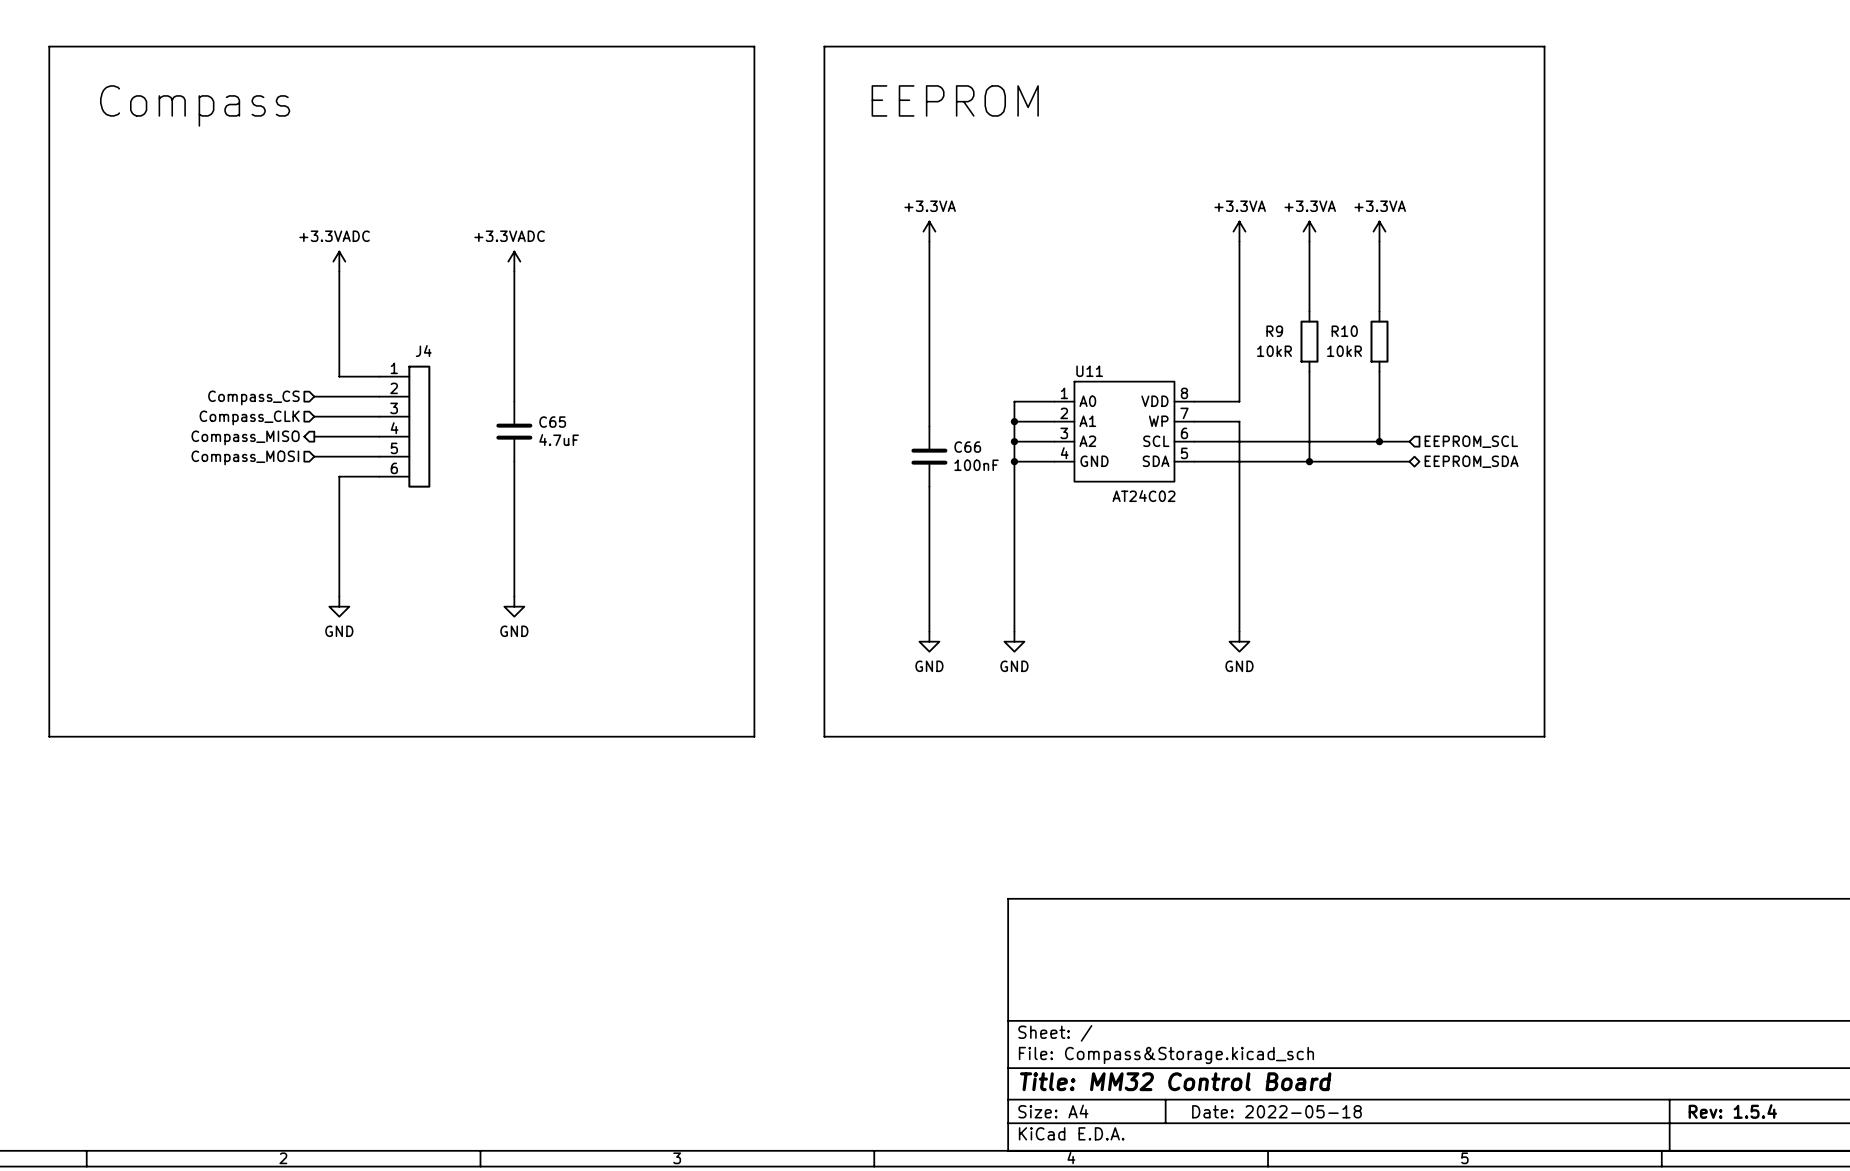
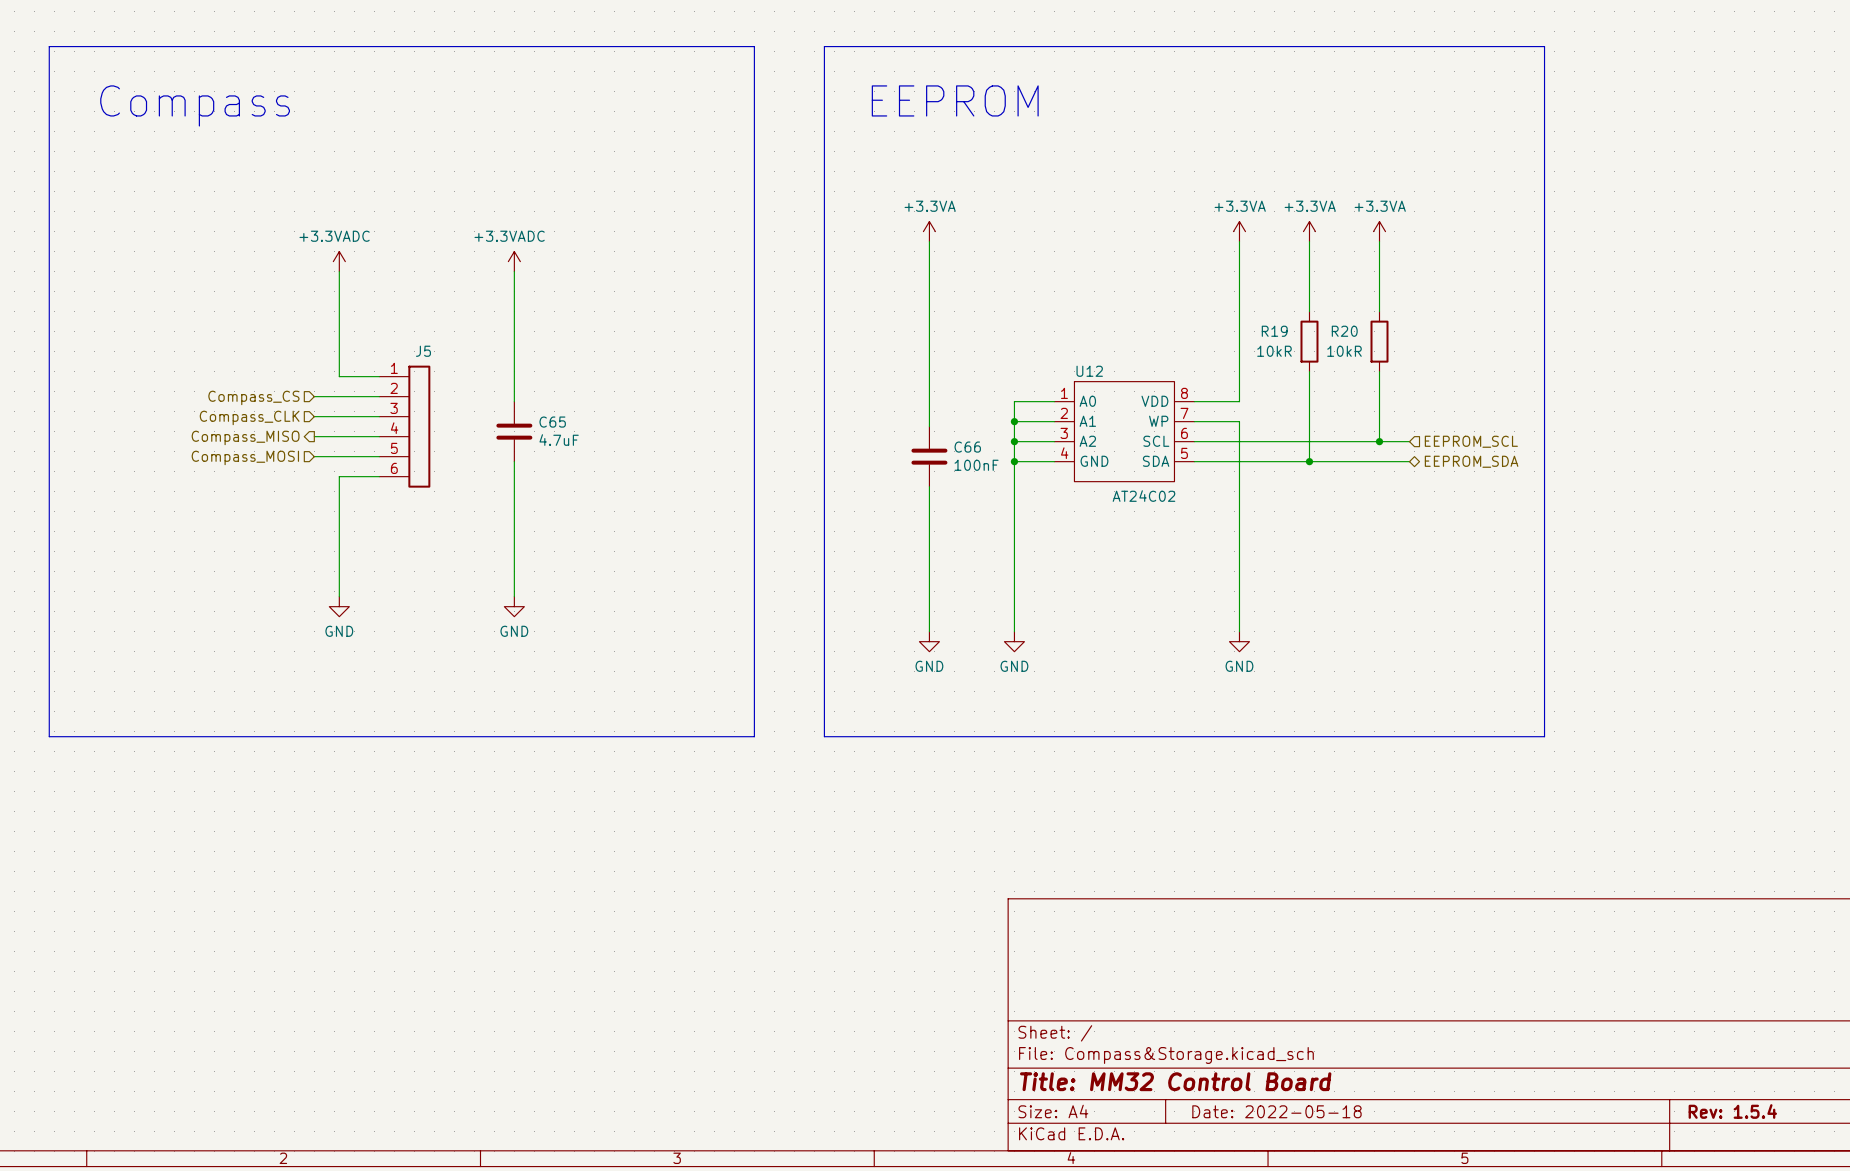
R9 name: R9 (1274, 331) -> R19 (1274, 331)
R10 name: R10 (1344, 331) -> R20 (1344, 331)
J4 name: J4 (423, 351) -> J5 (423, 351)
U11 name: U11 (1089, 371) -> U12 (1089, 371)

